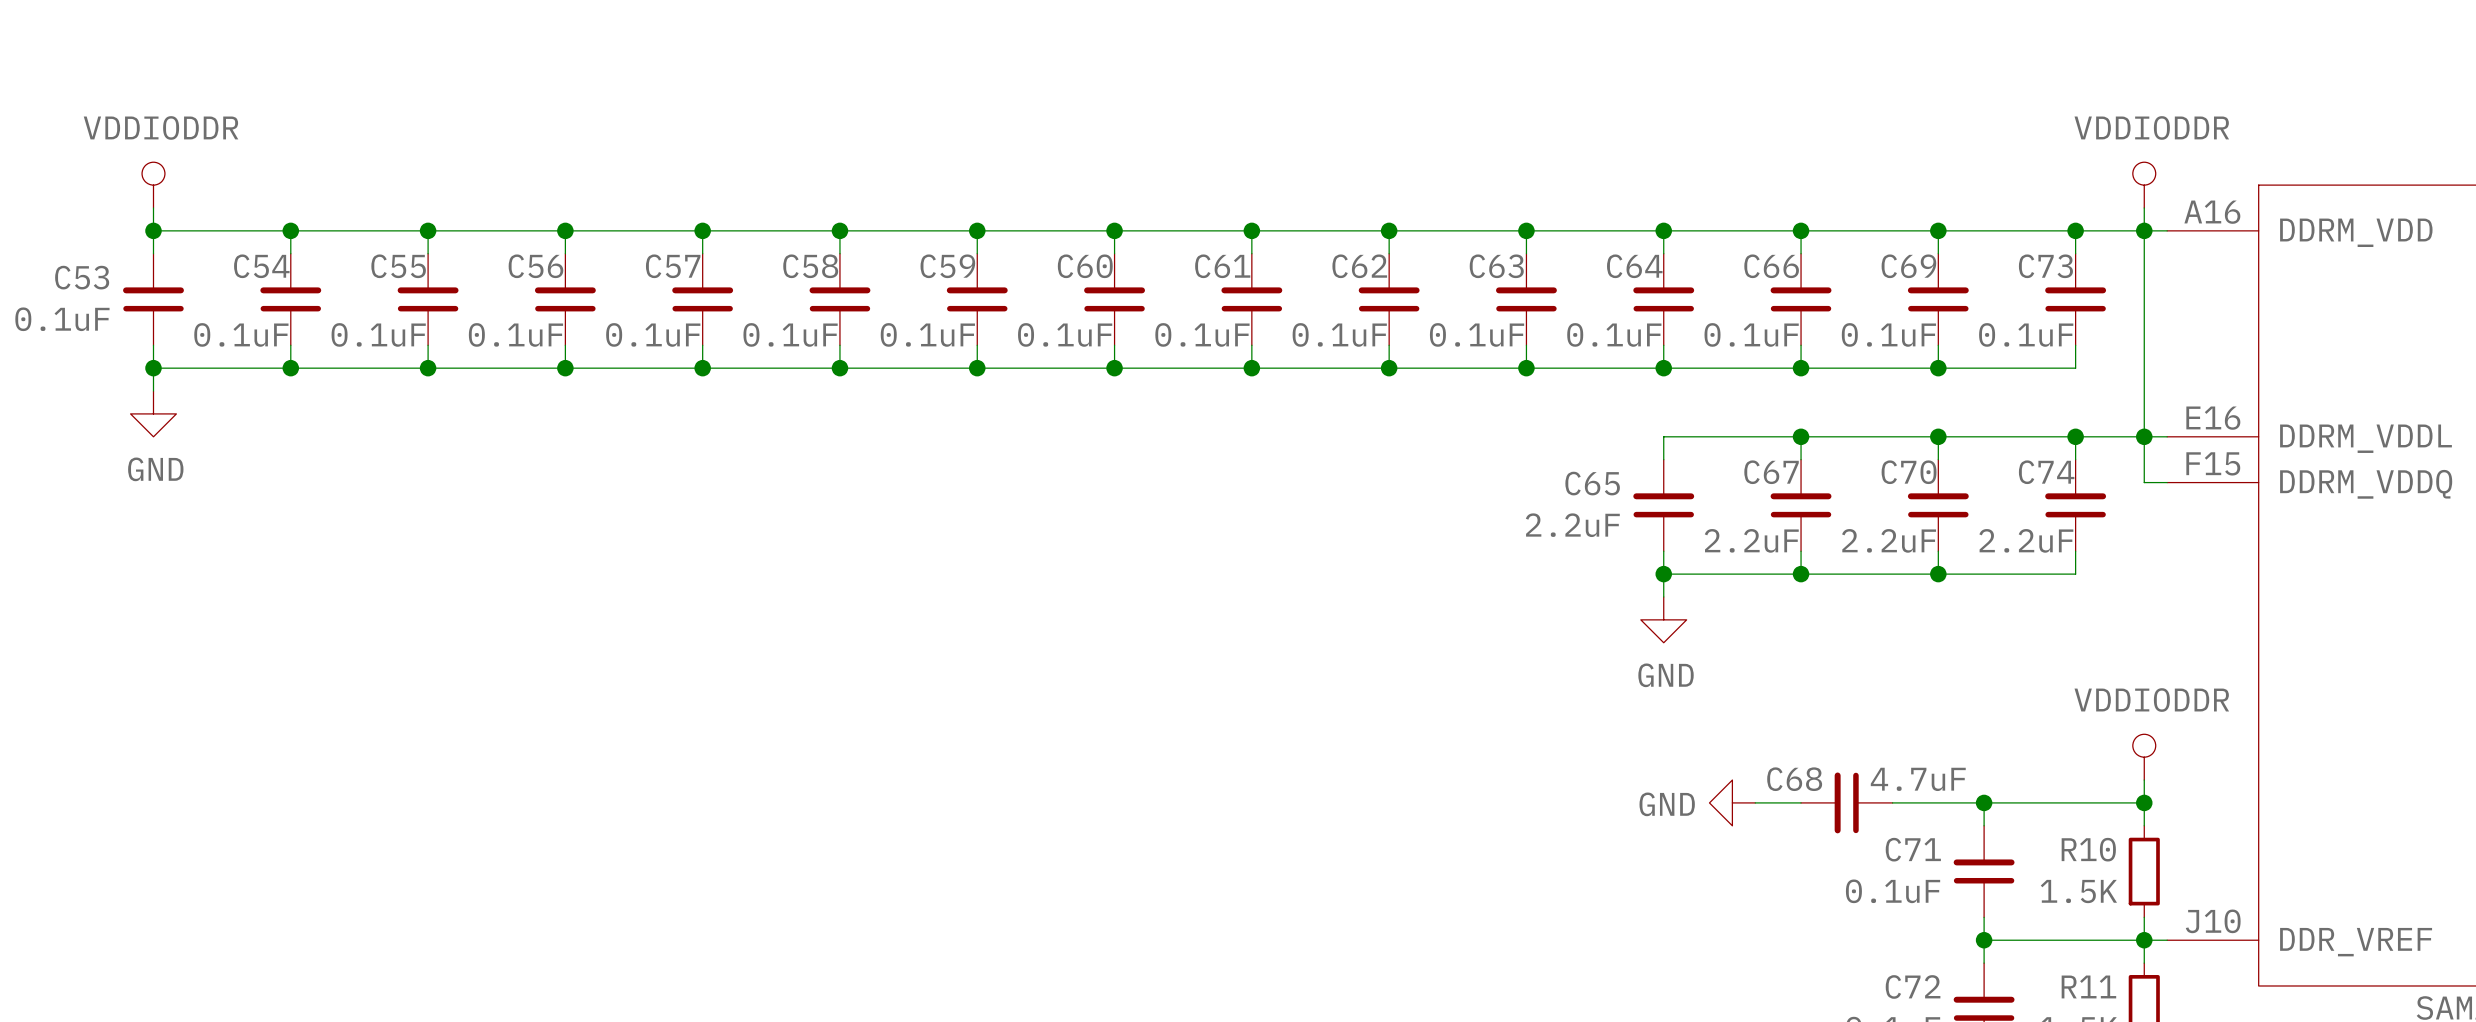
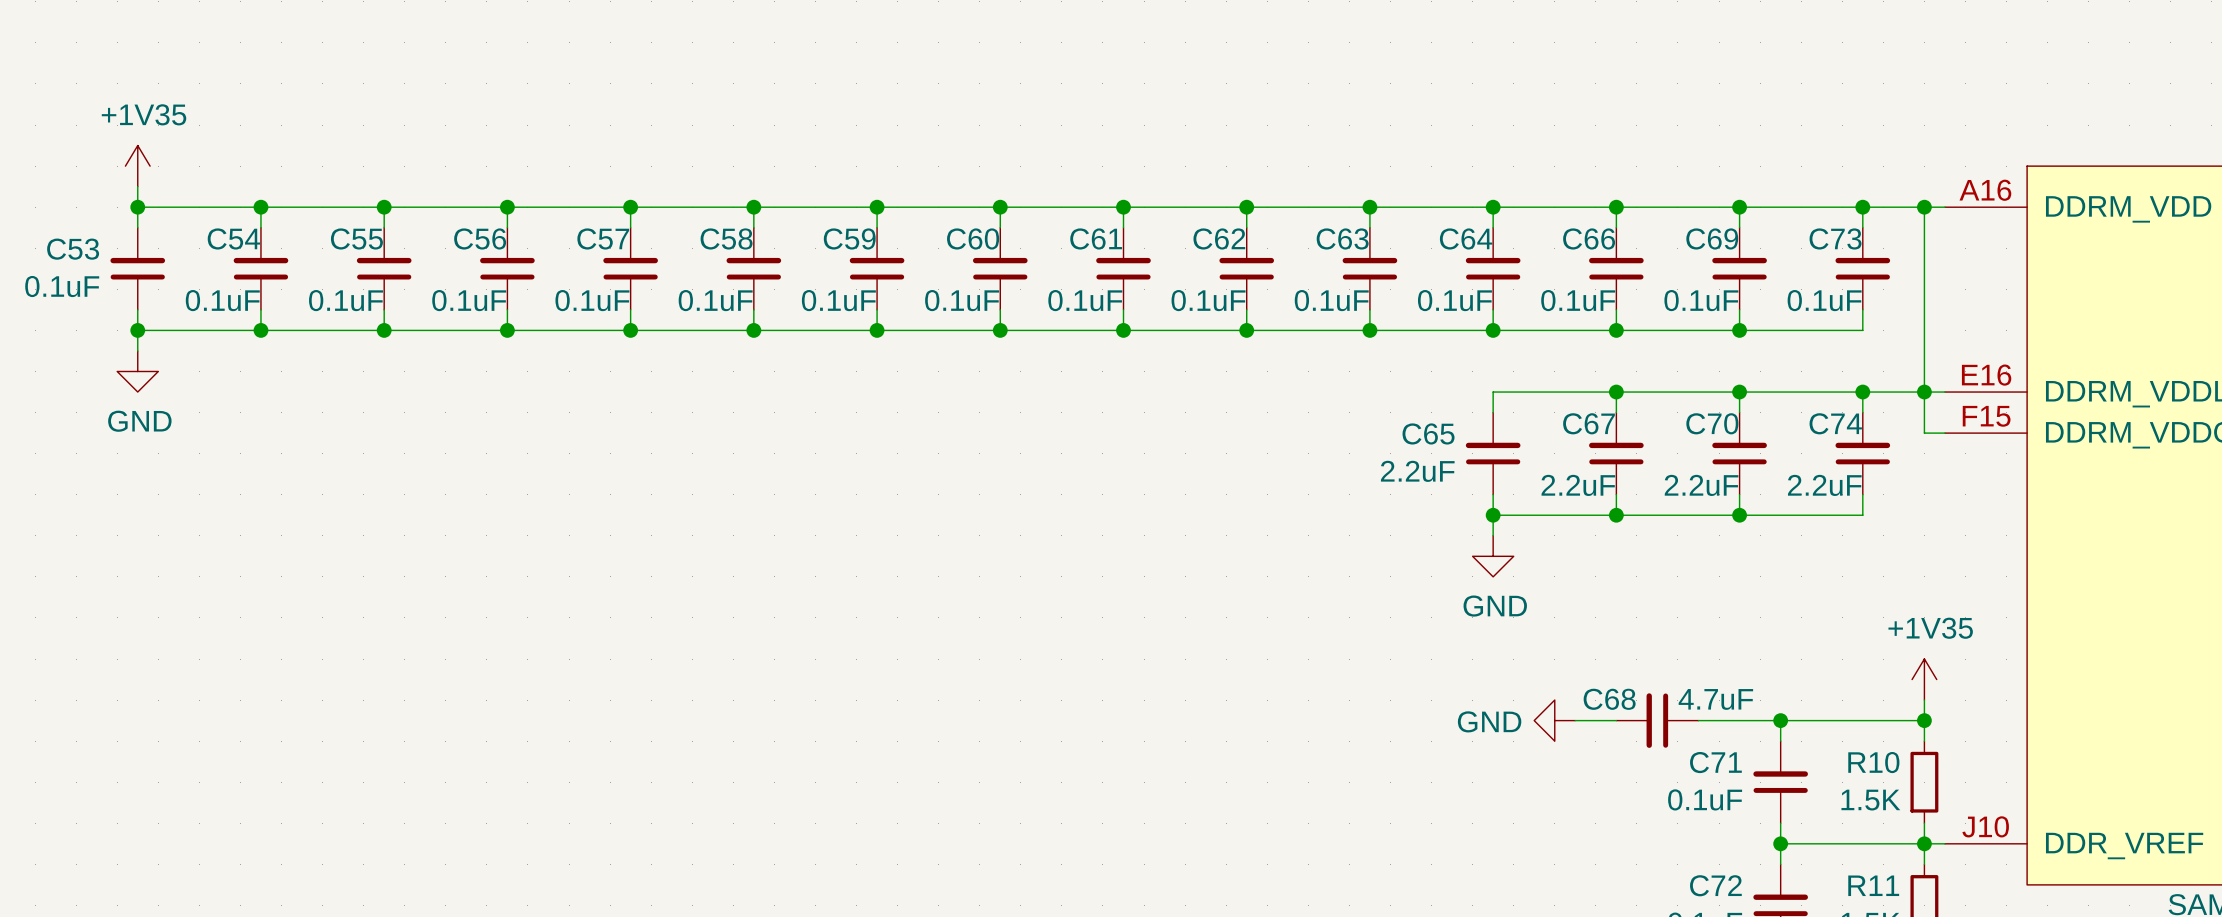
power symbol: VDDIODDR (153, 185) -> +1V35 (137, 166)
power symbol: VDDIODDR (2144, 185) -> none
wire: (2144, 207) (2144, 230) -> none
power symbol: VDDIODDR (2144, 757) -> +1V35 (1924, 679)

